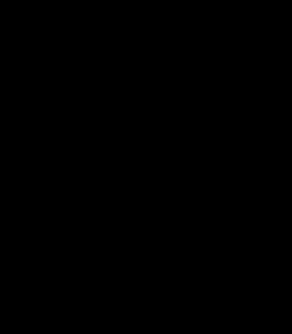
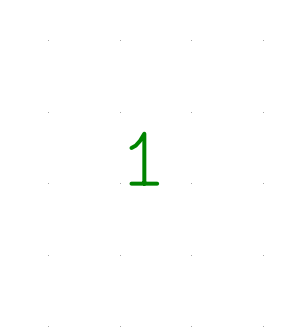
text: none -> 1 (144, 158)

